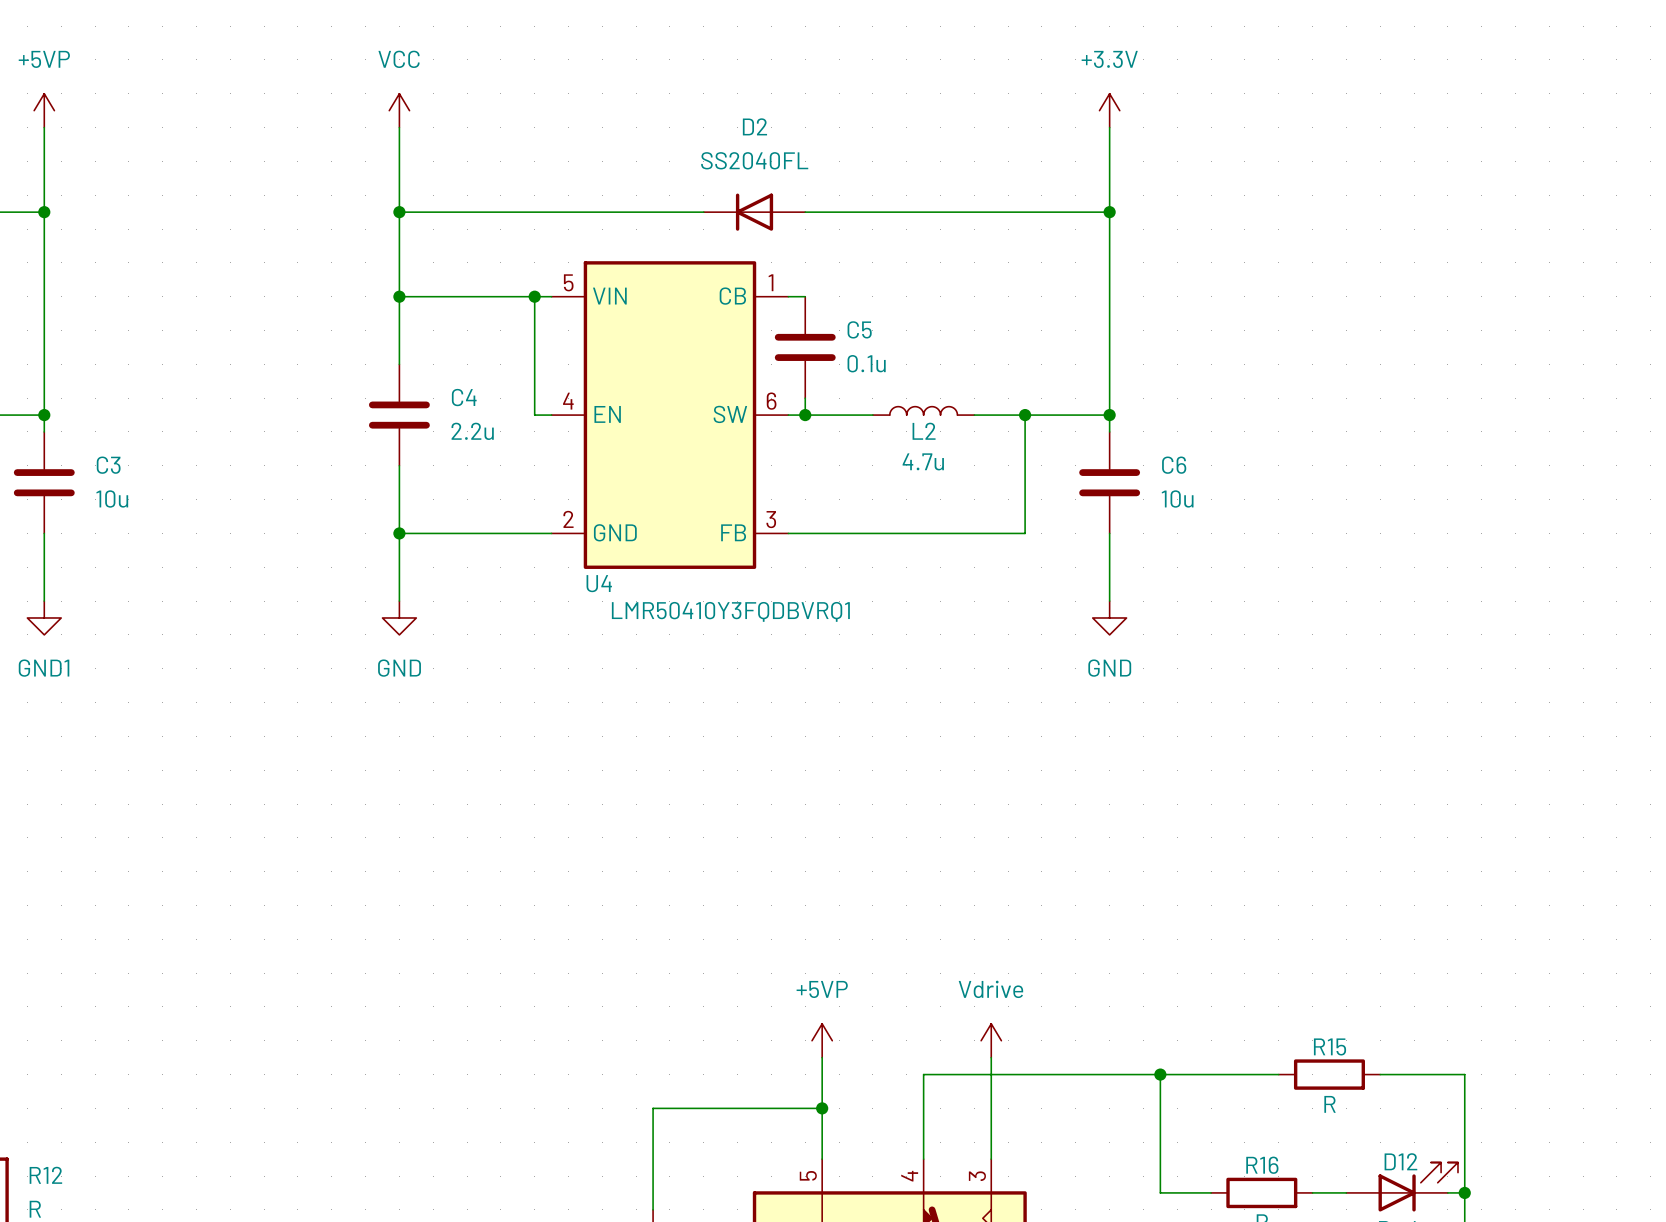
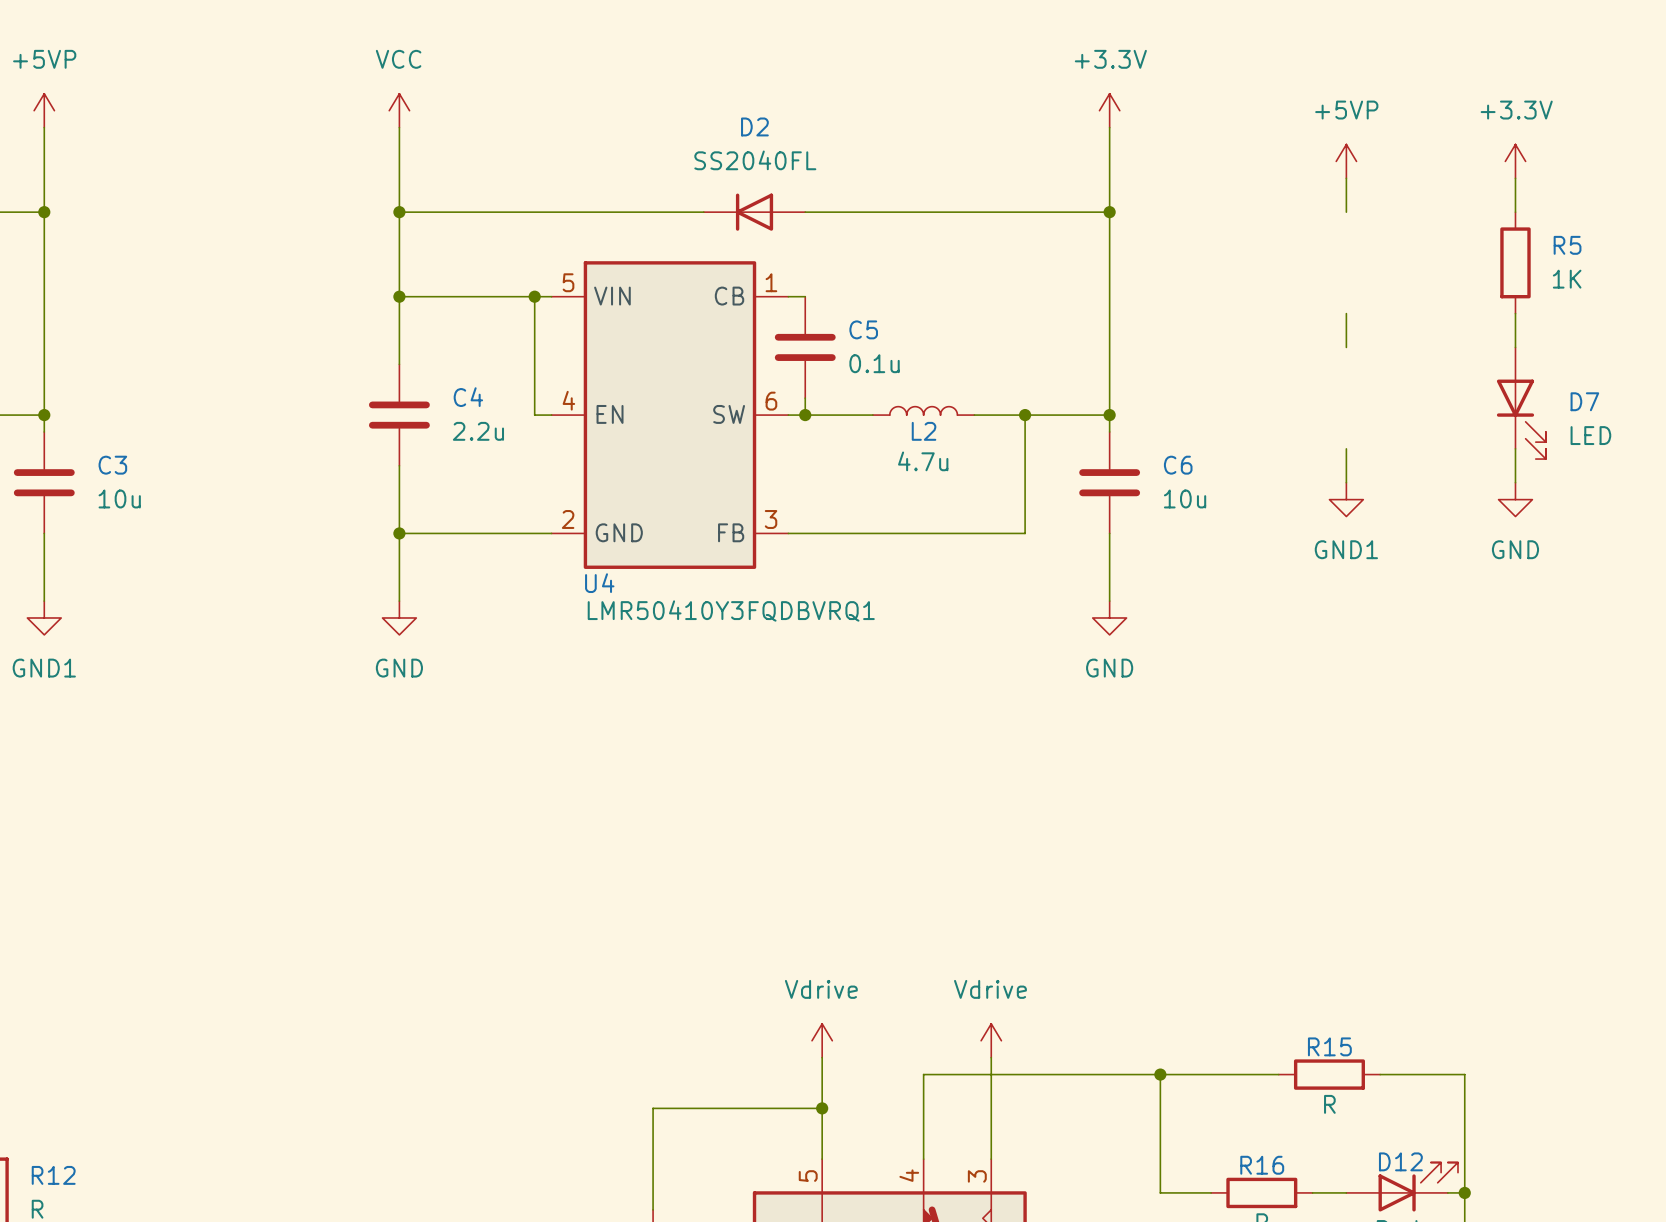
power symbol: none -> +5VP (1346, 161)
power symbol: none -> +3.3V (1515, 161)
wire: none -> (1346, 178) (1346, 212)
wire: none -> (1515, 178) (1515, 212)
R5: none -> 1K (1515, 262)
wire: none -> (1346, 313) (1346, 347)
wire: none -> (1515, 313) (1515, 347)
D7: none -> LED (1521, 403)
wire: none -> (1346, 448) (1346, 482)
wire: none -> (1515, 448) (1515, 482)
power symbol: none -> GND1 (1346, 499)
power symbol: none -> GND (1515, 499)
power symbol: +5VP (822, 1040) -> Vdrive (822, 1040)

